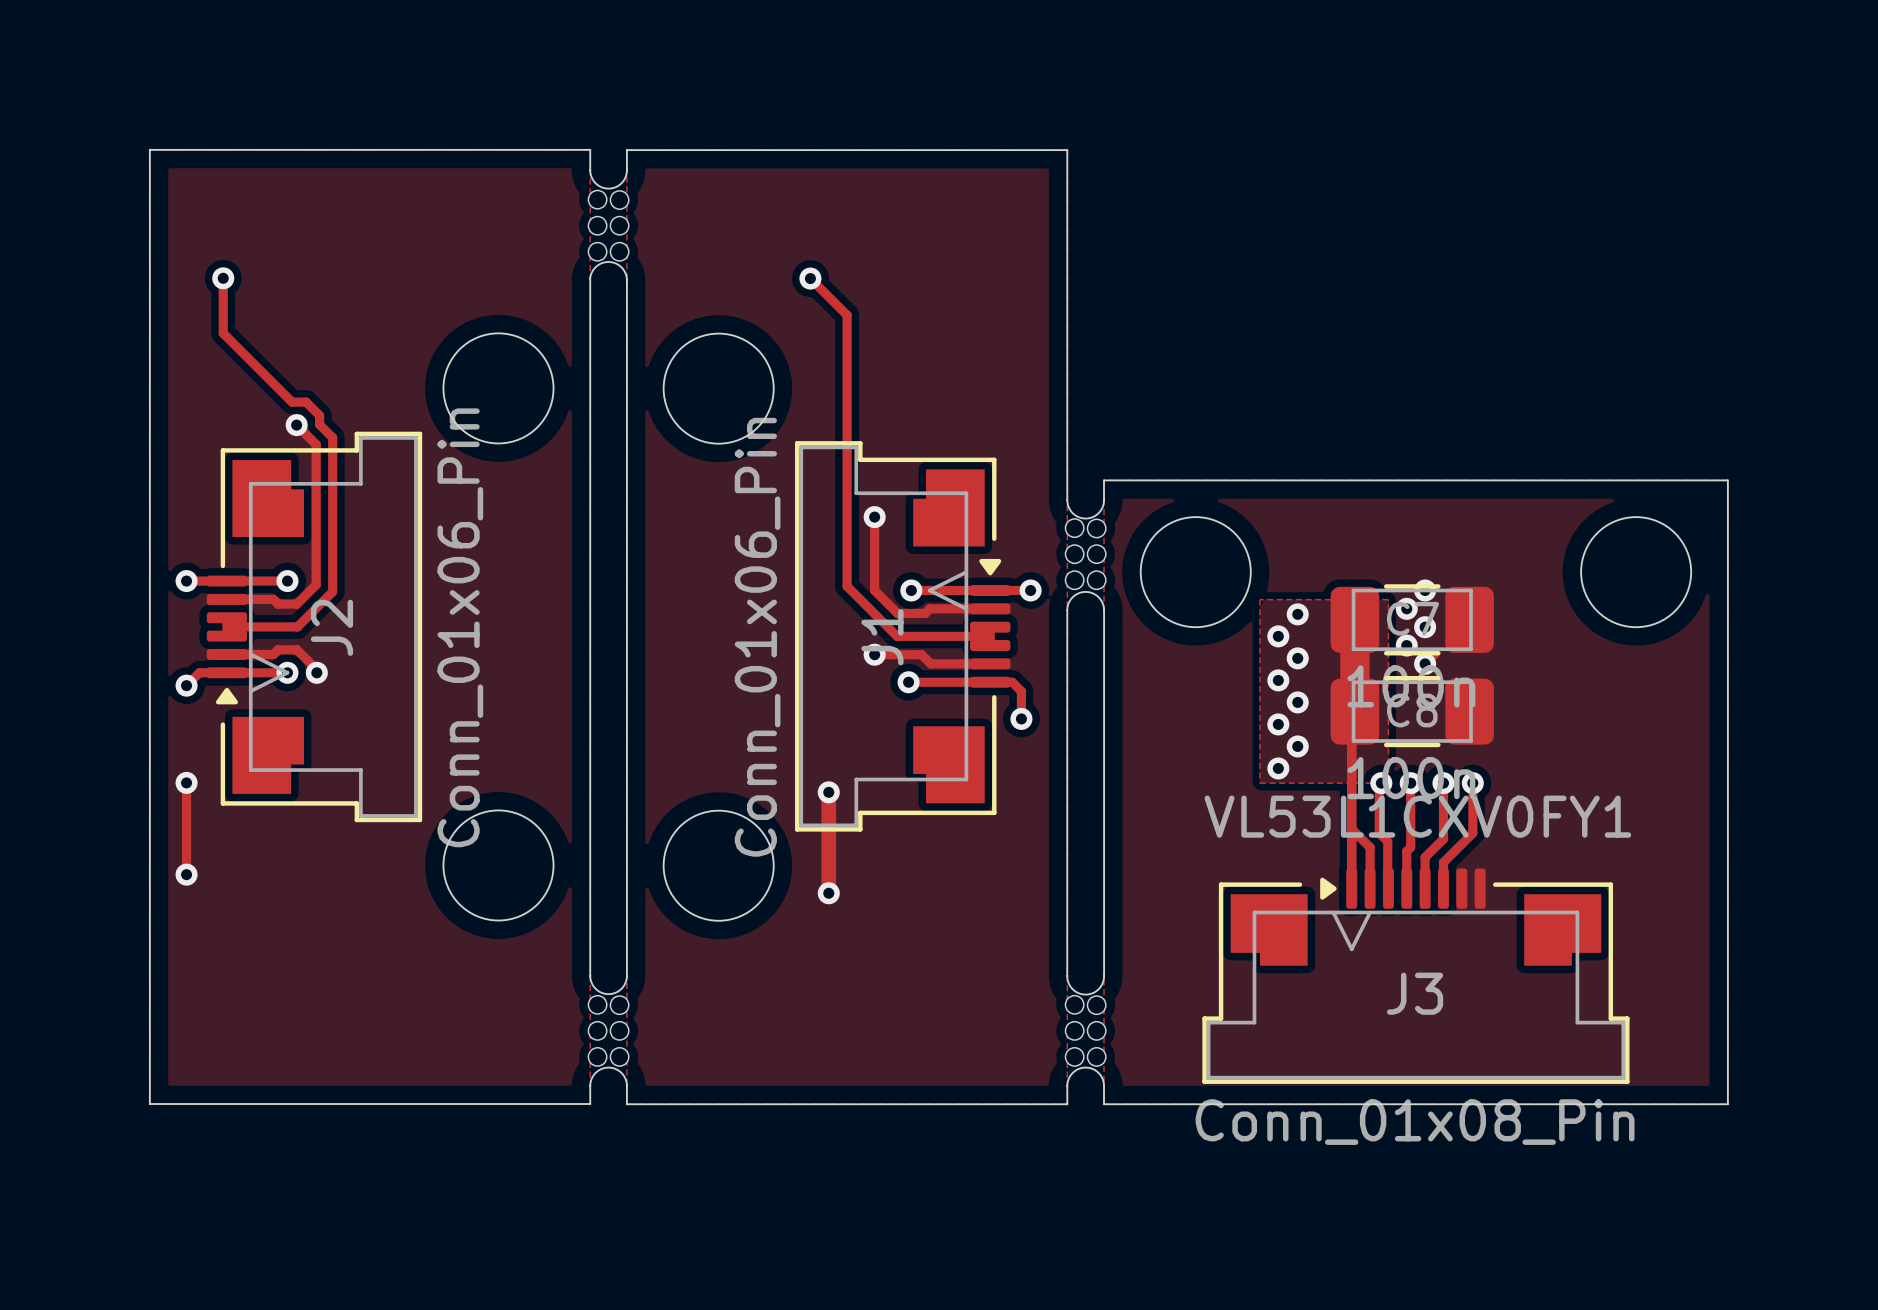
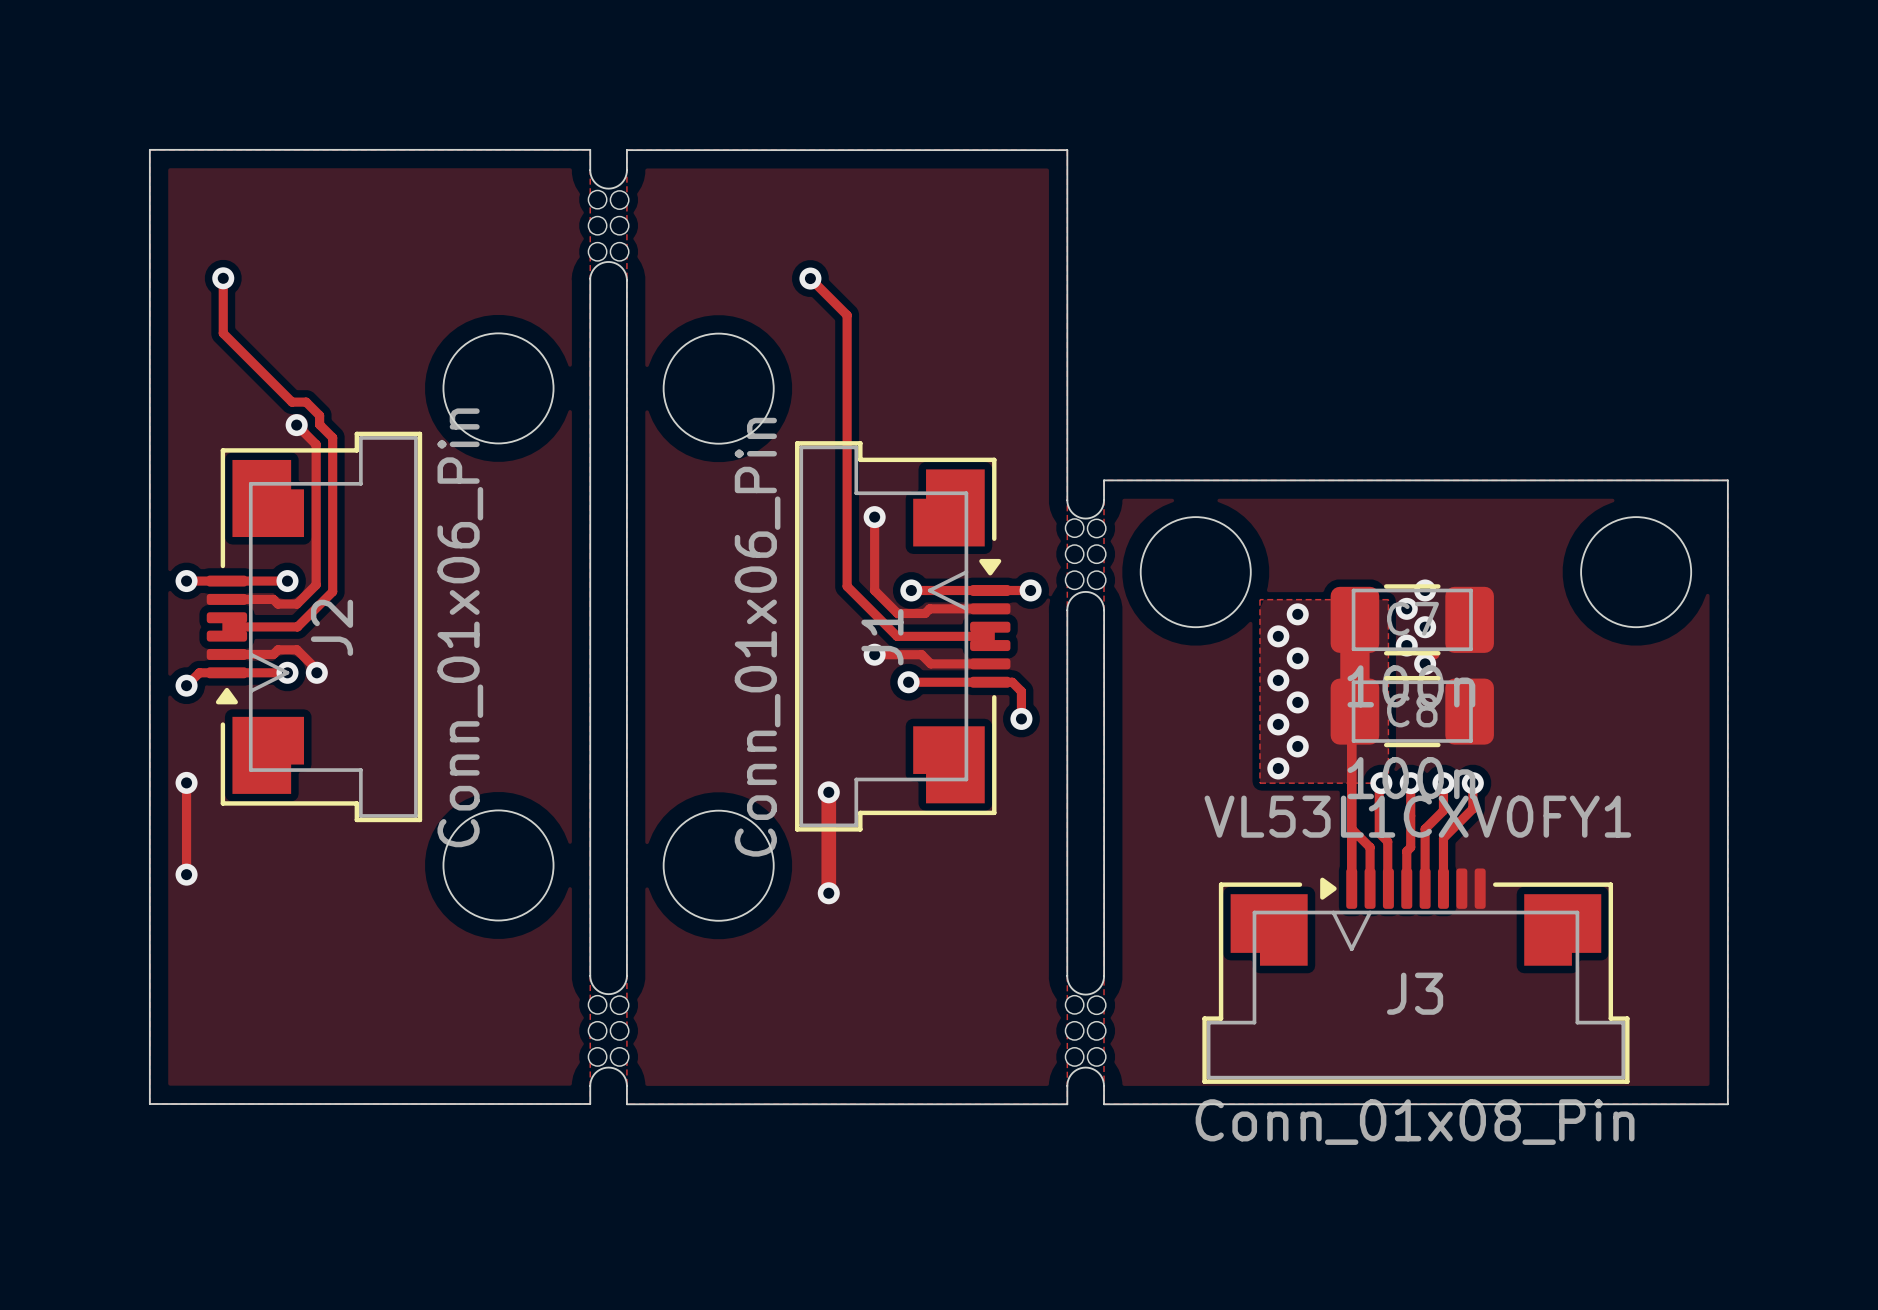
track: (1472, 808) (1472, 833) (1443, 862) -> (1472, 808) (1443, 838)
track: (1443, 810) (1443, 838) -> (1443, 810) (1425, 829) (1425, 857)
track: (1443, 839) (1425, 857) -> (1443, 839) (1443, 862)

